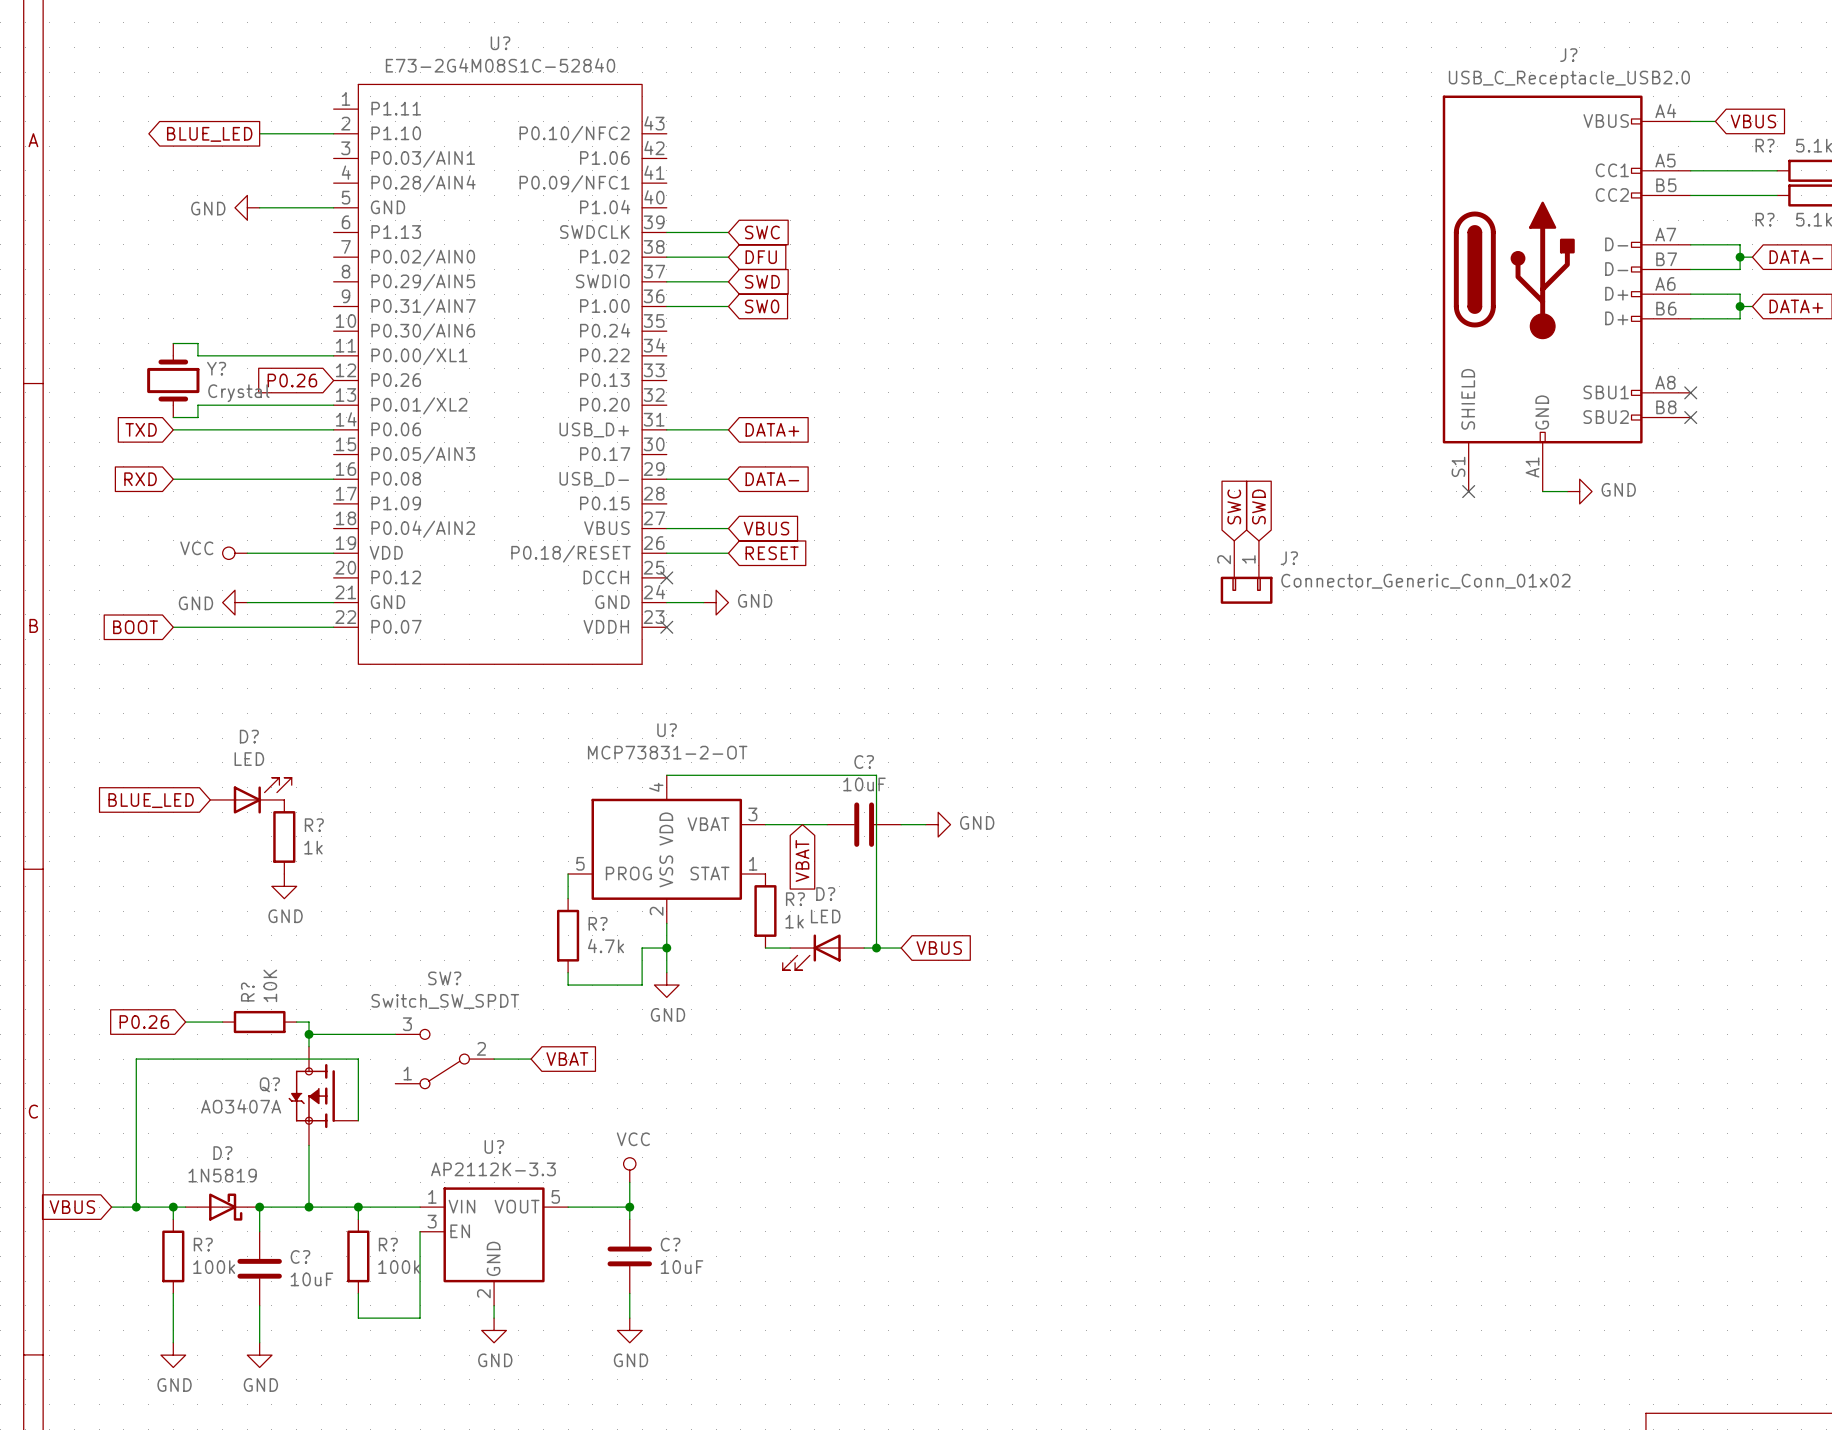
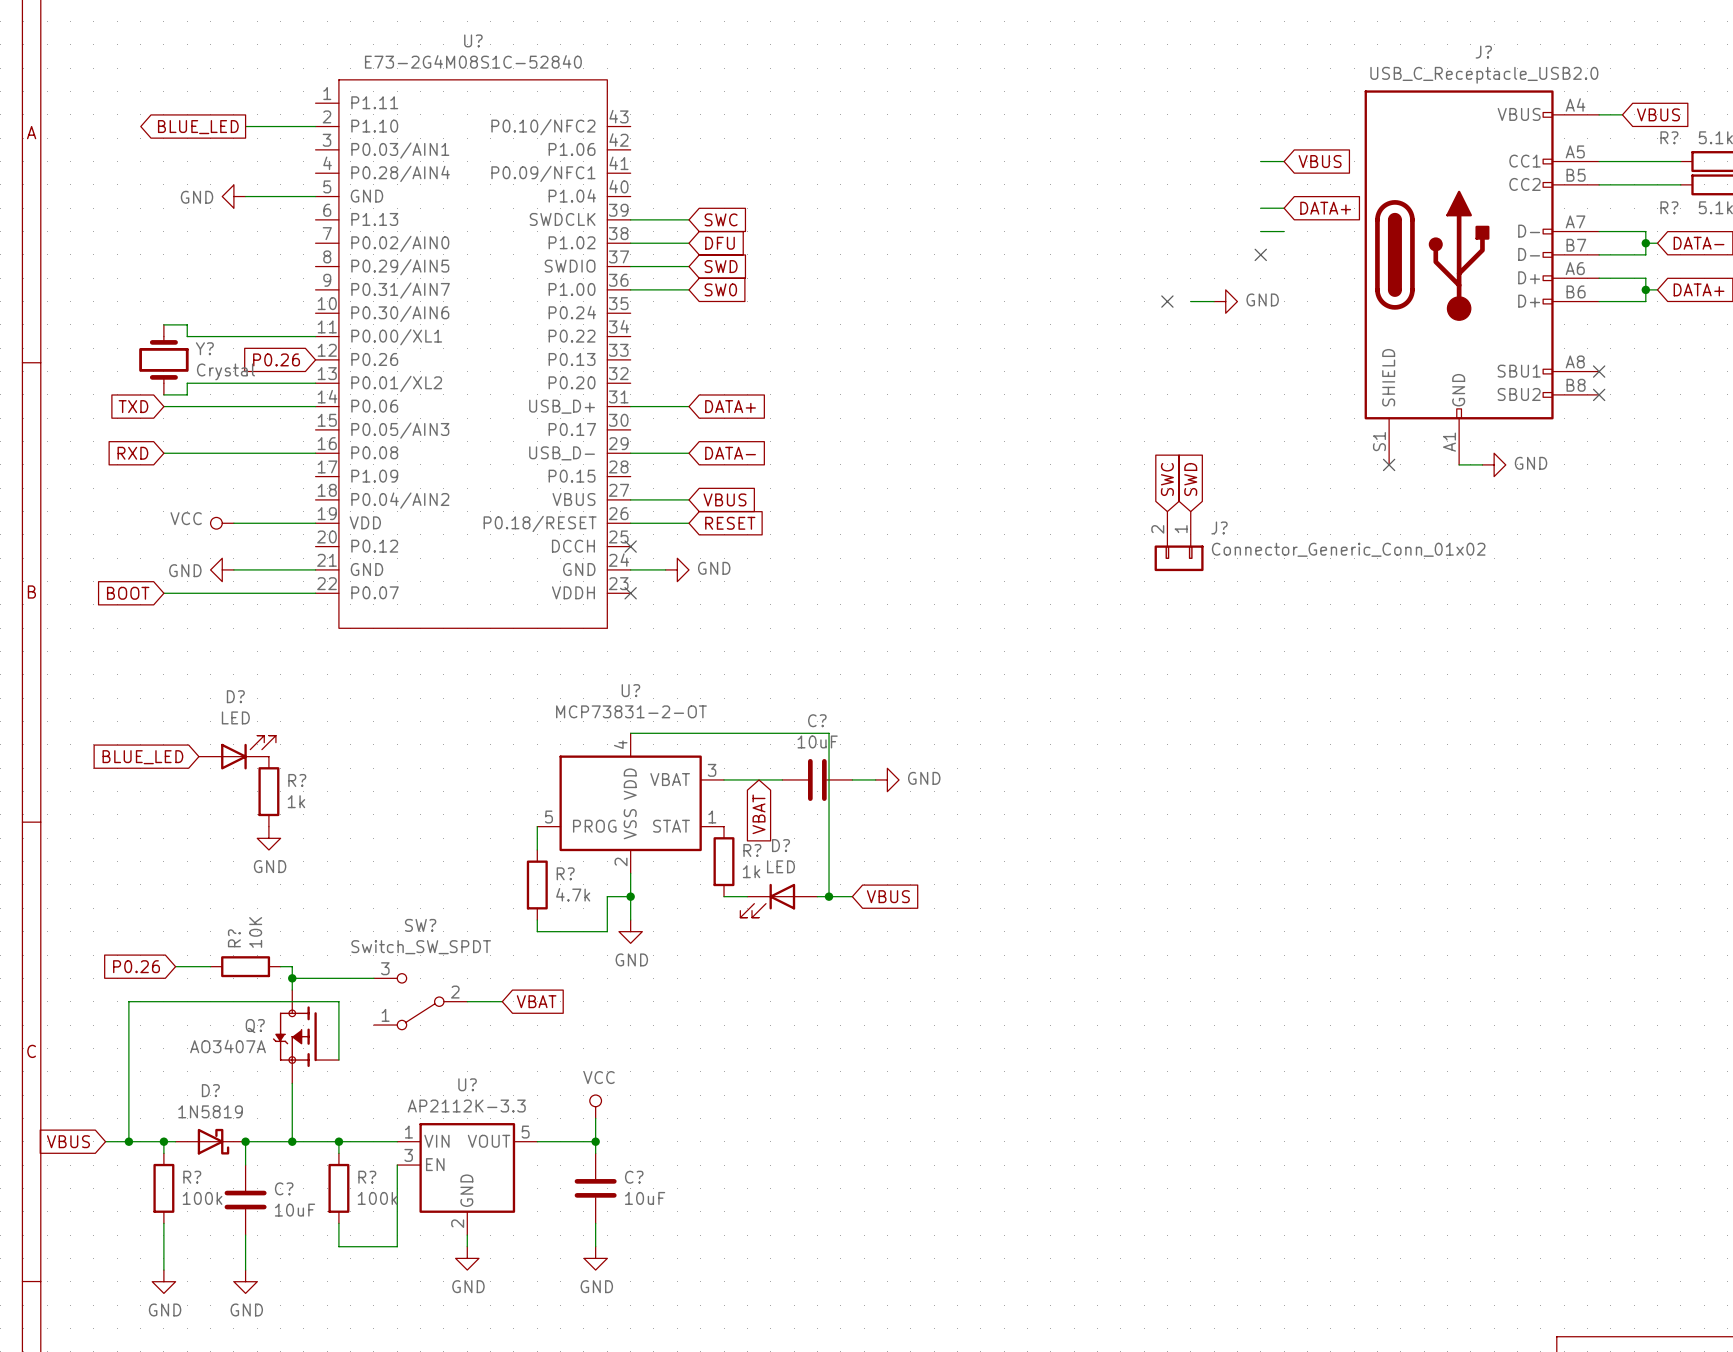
wire: none -> (1260, 161) (1284, 161)
global label: none -> VBUS (1320, 161)
wire: none -> (1260, 208) (1284, 208)
global label: none -> DATA+ (1325, 208)
wire: none -> (1260, 231) (1284, 231)
no-connect mark: none -> (1260, 254)
no-connect mark: none -> (1167, 301)
wire: none -> (1190, 301) (1214, 301)
power symbol: none -> GND (1225, 301)

